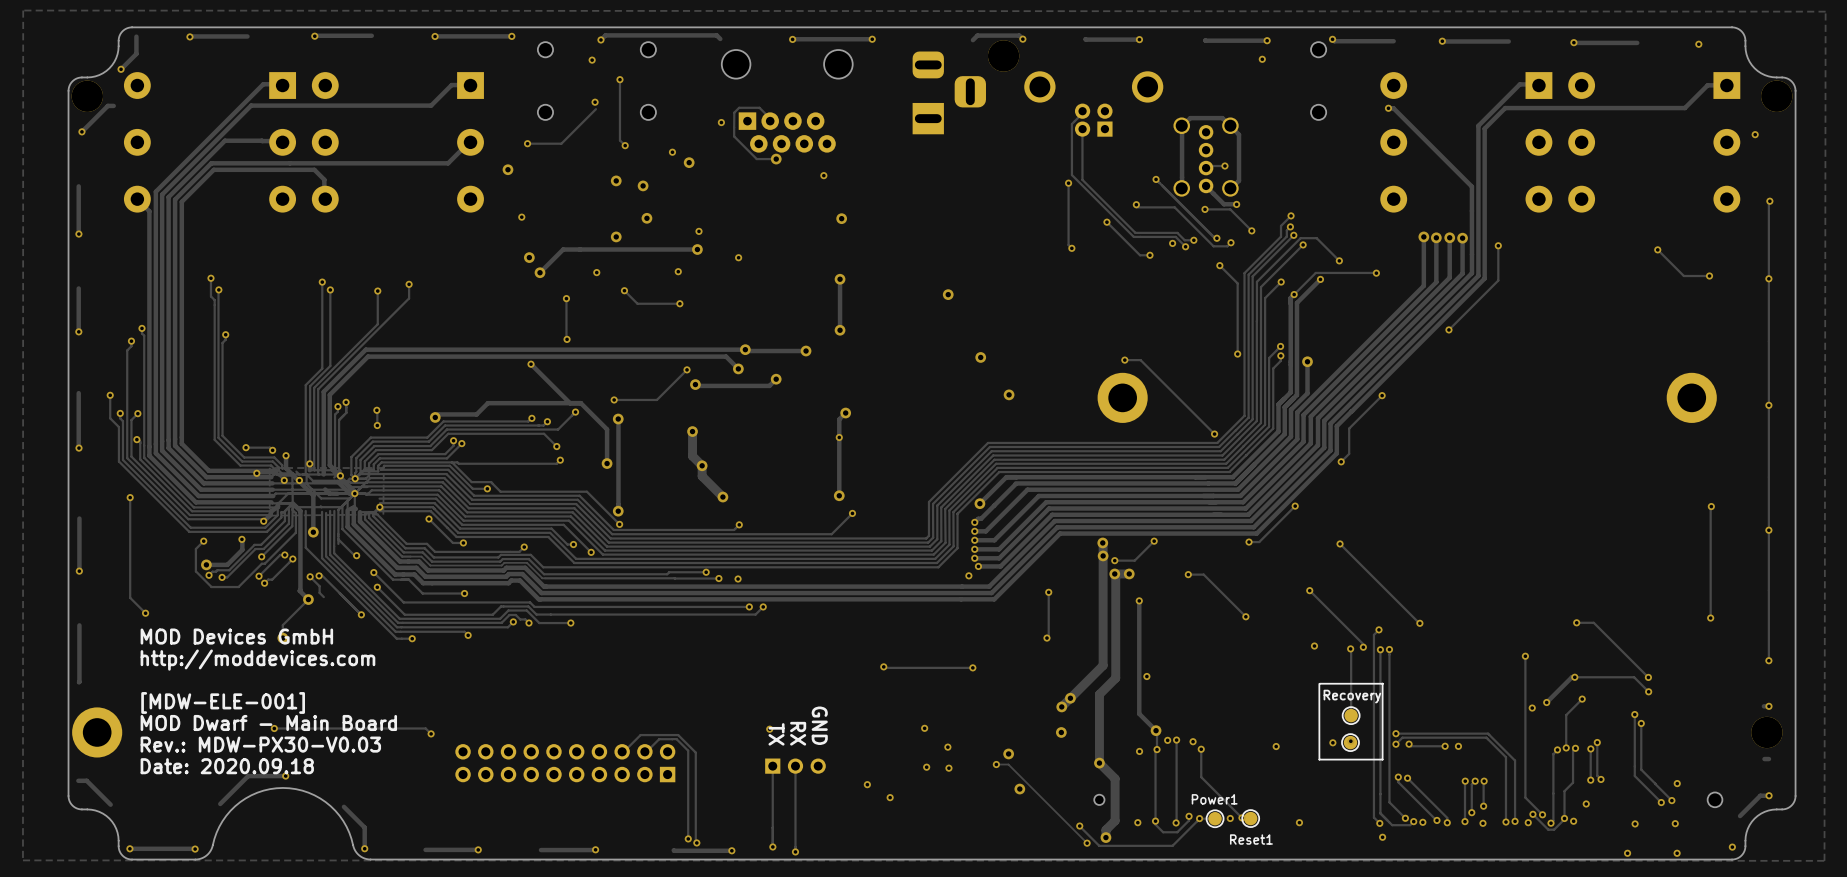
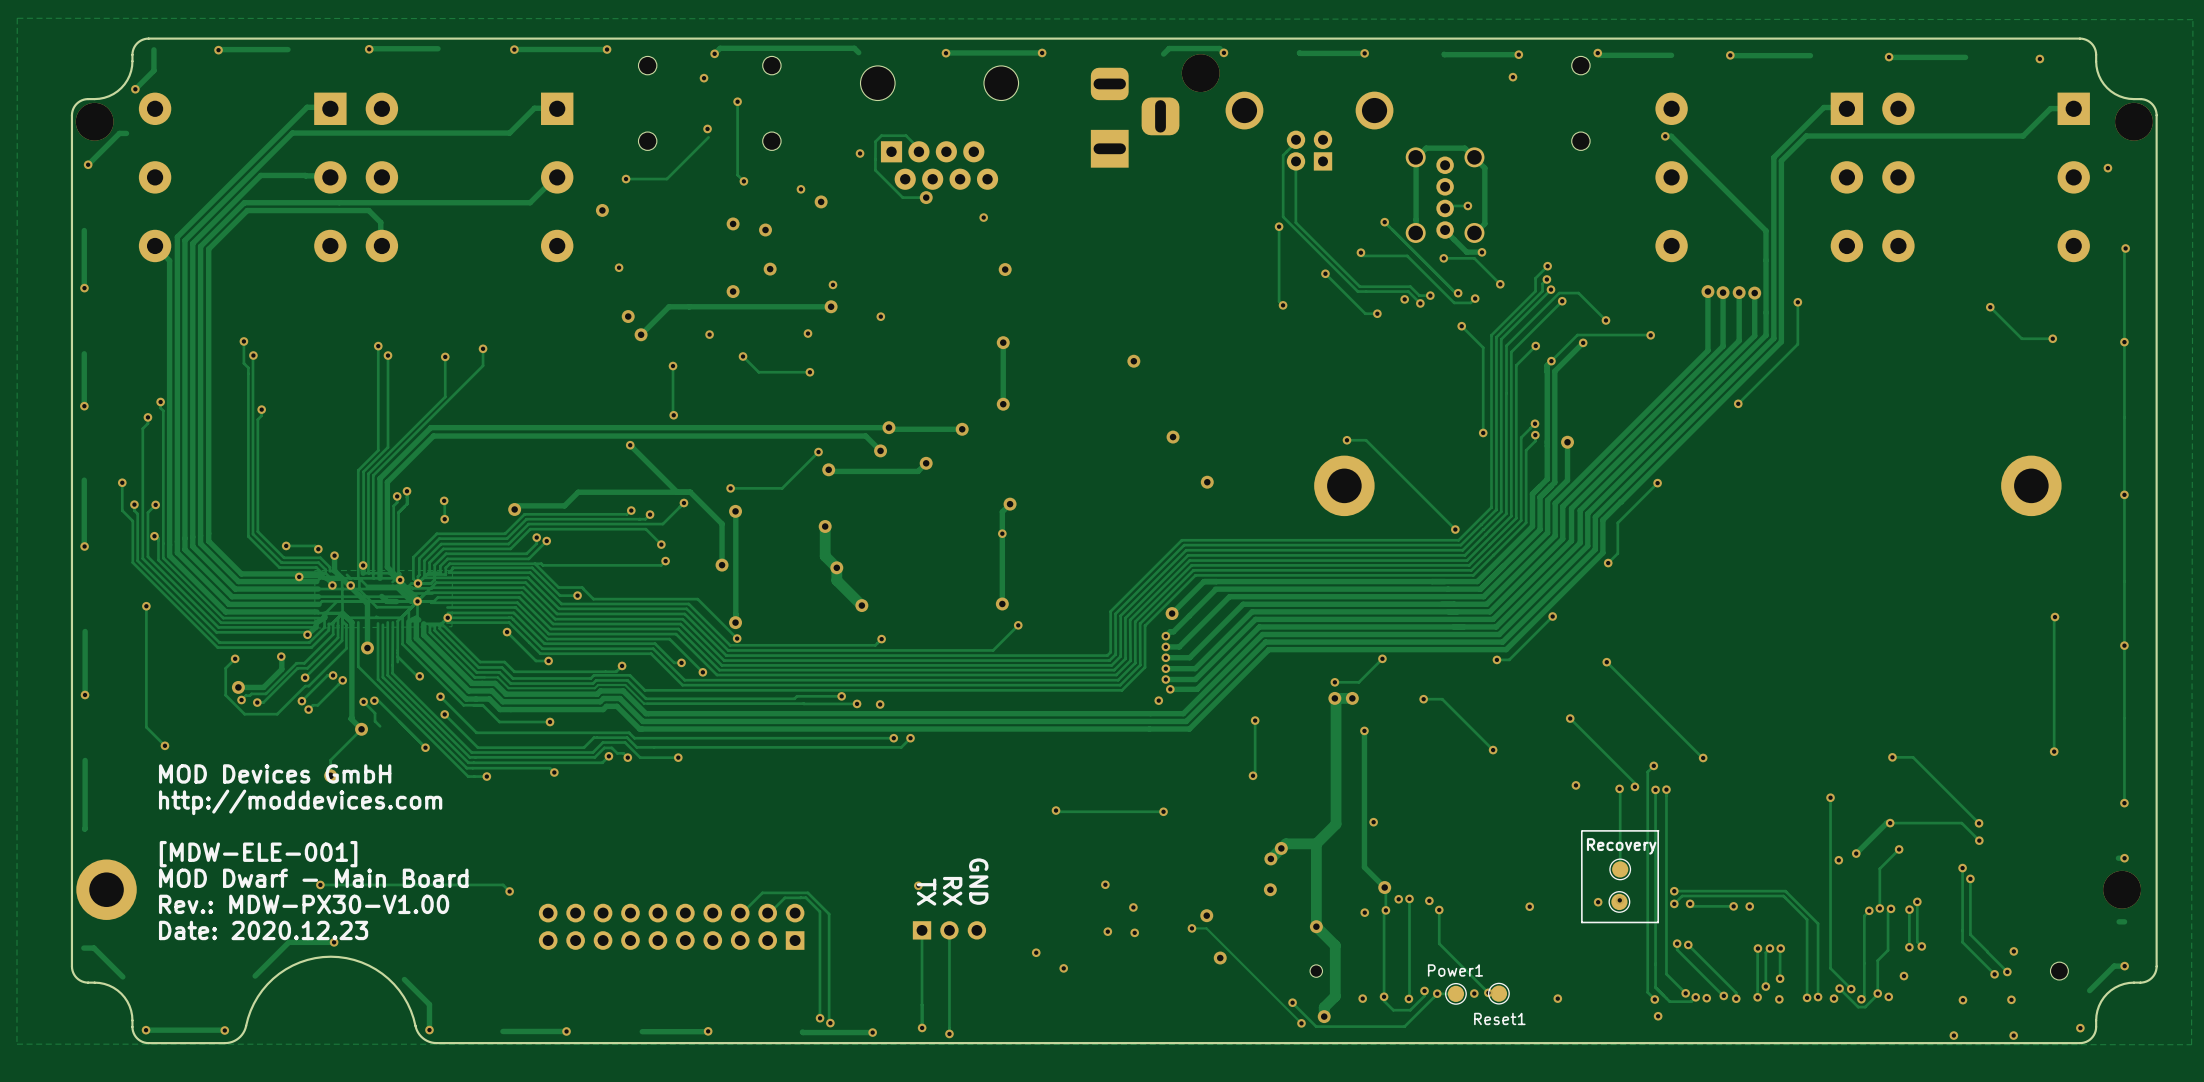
track: (1102, 542) (1103, 665) (1074, 694) -> (1316, 843) (1285, 843)
via: (1102, 542) -> none
via: (1103, 555) -> none
text: Rev.: MDW-PX30-V0.03 (260, 744) -> Rev.: MDW-PX30-V1.00 (304, 904)
text: Date: 2020.09.18 (227, 766) -> Date: 2020.12.23 (263, 930)

